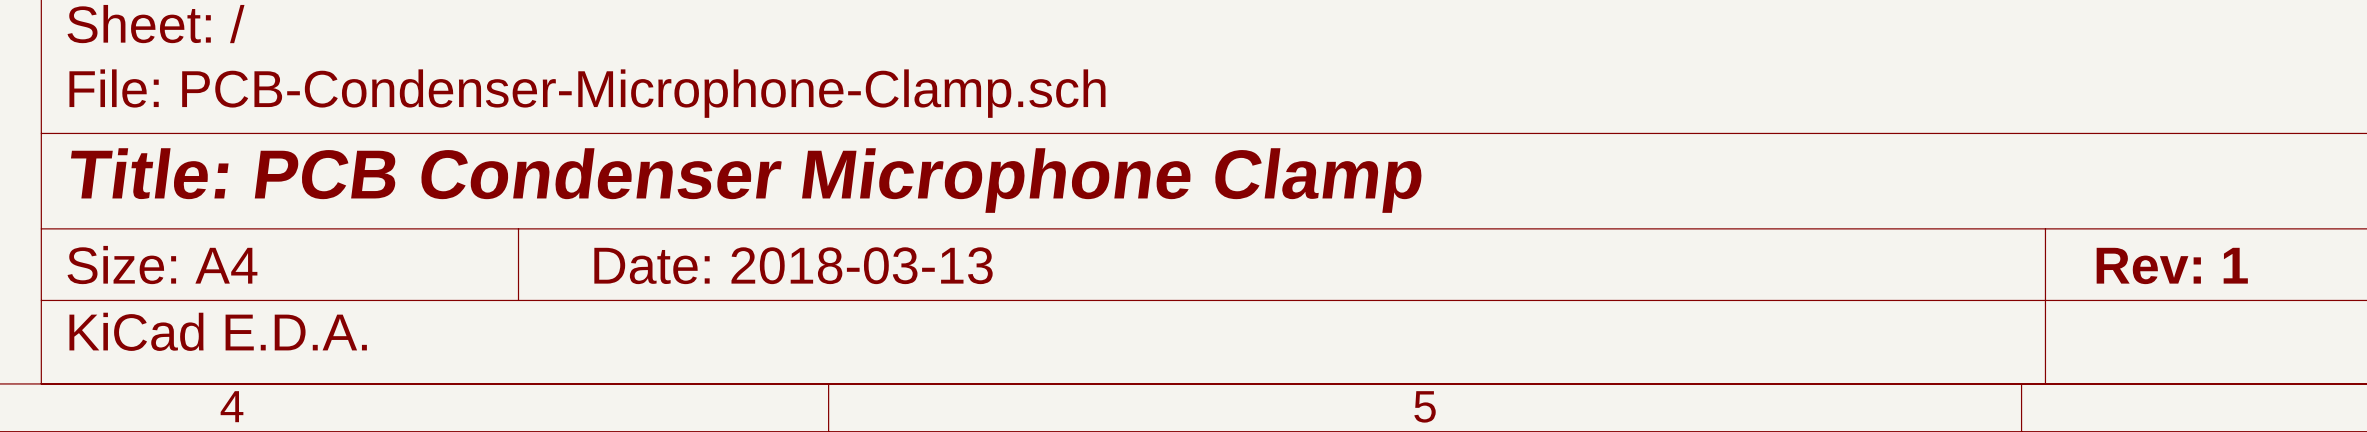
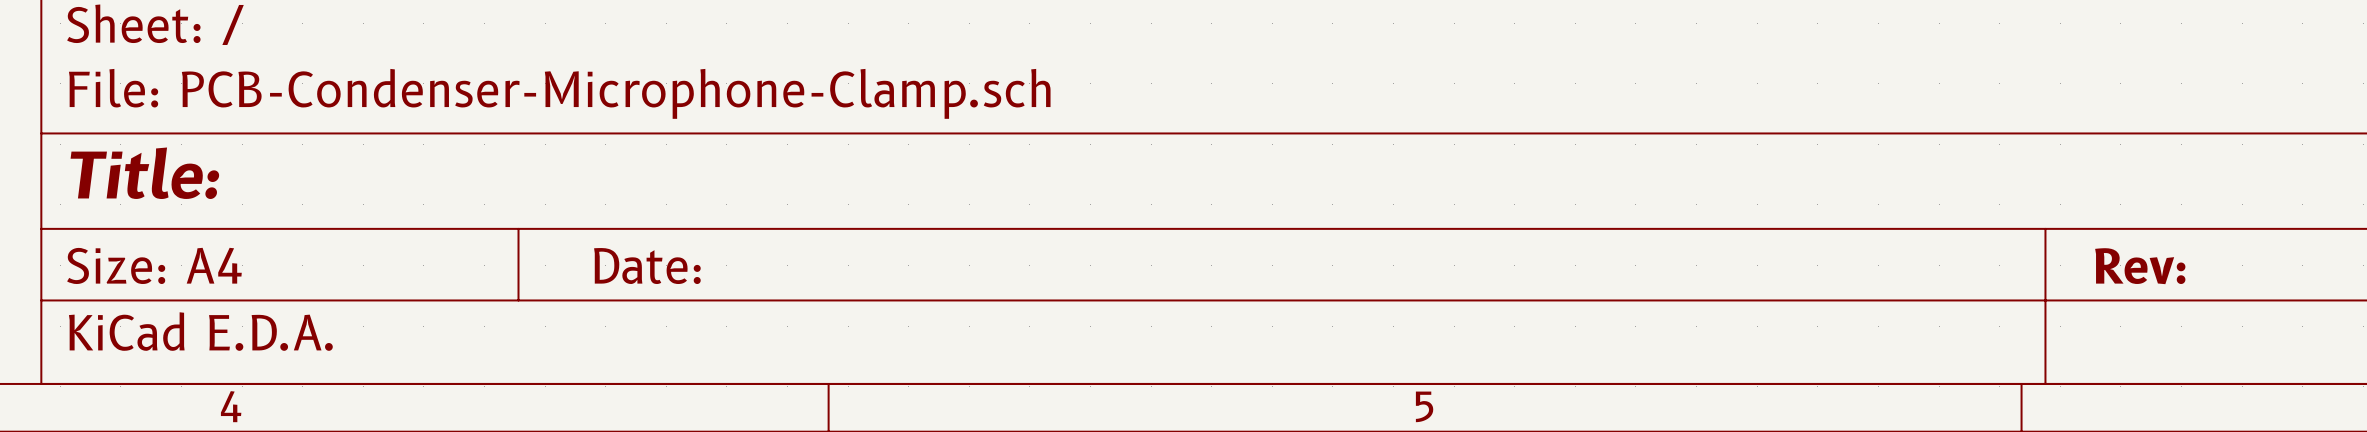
title block: Title: PCB Condenser Microphone Clamp (746, 180) -> Title: (144, 173)
title block: Date: 2018-03-13 (793, 265) -> Date: (647, 266)
title block: Rev: 1 (2172, 265) -> Rev: (2140, 266)

